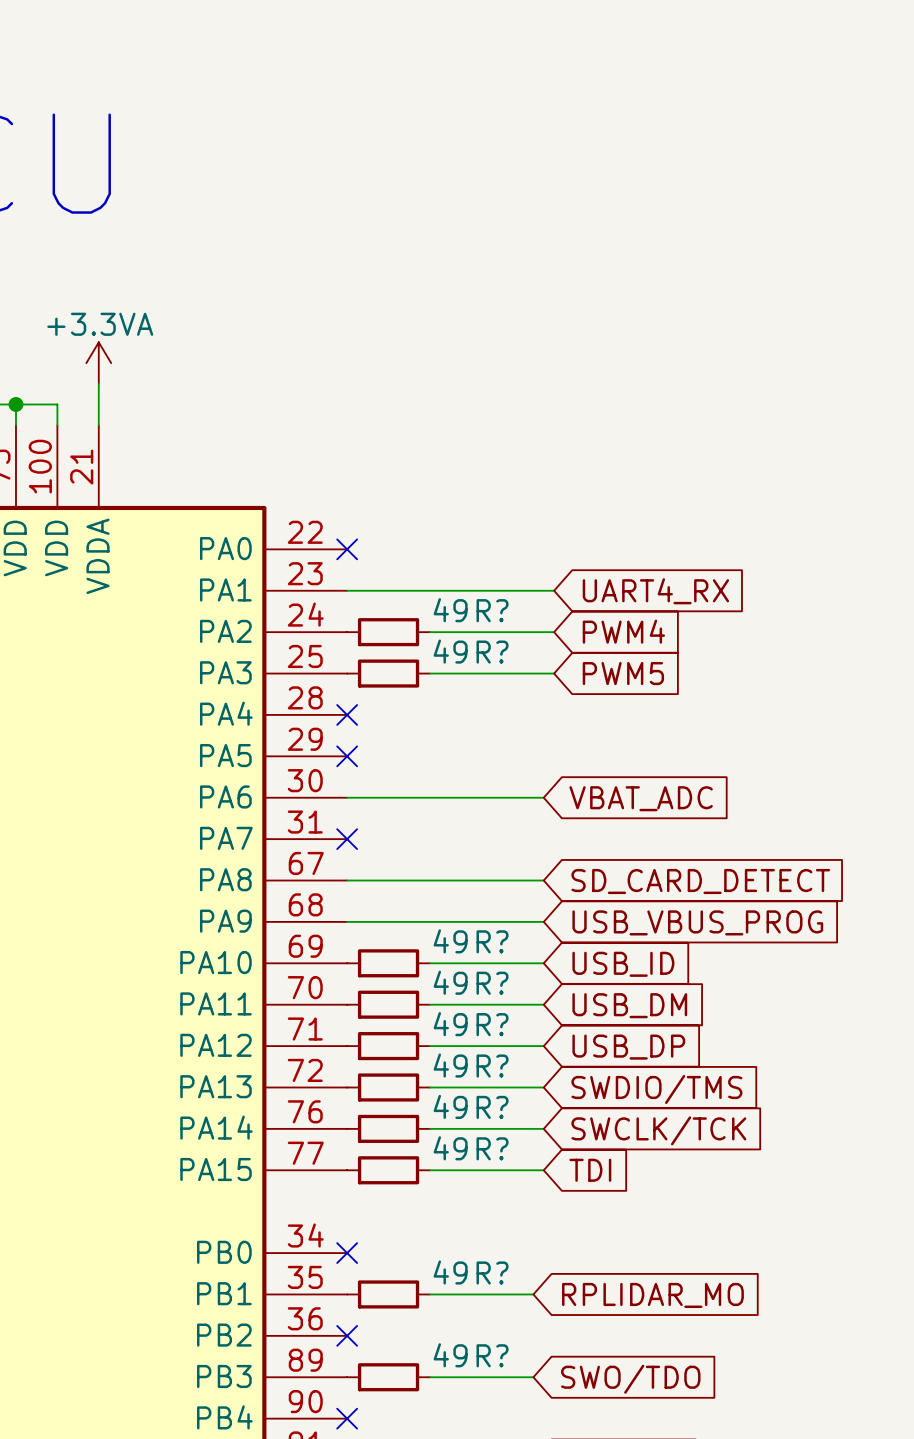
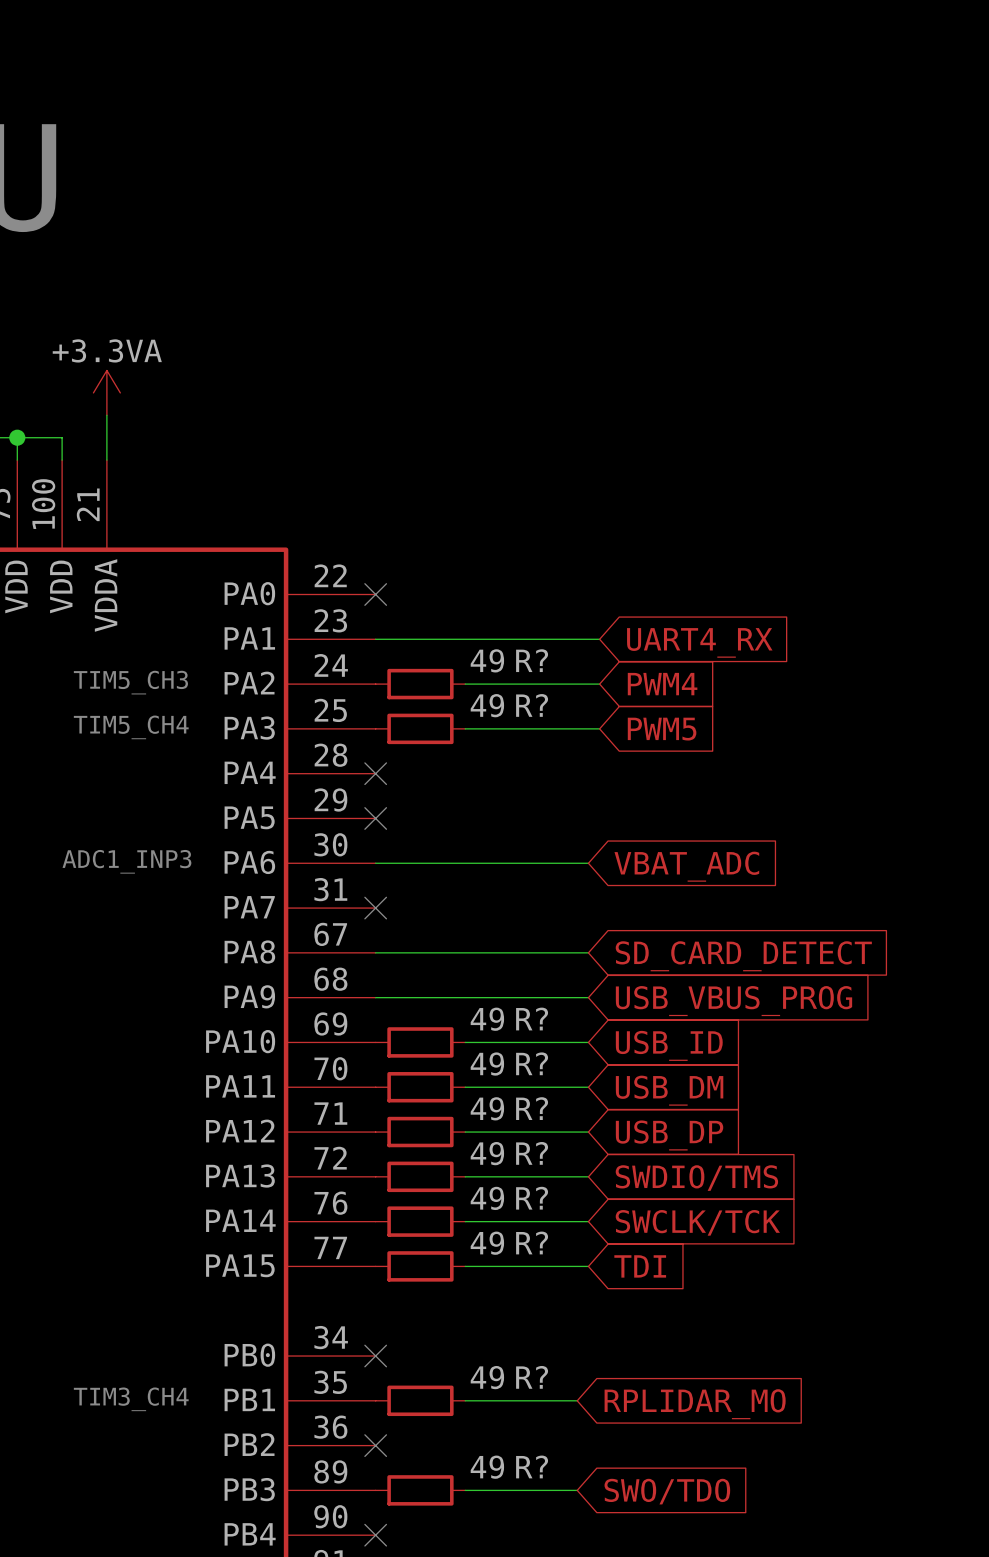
text: none -> TIM5_CH3 (130, 682)
text: none -> TIM5_CH4 (131, 727)
text: none -> ADC1_INP3 (126, 861)
text: none -> TIM3_CH4 (131, 1399)

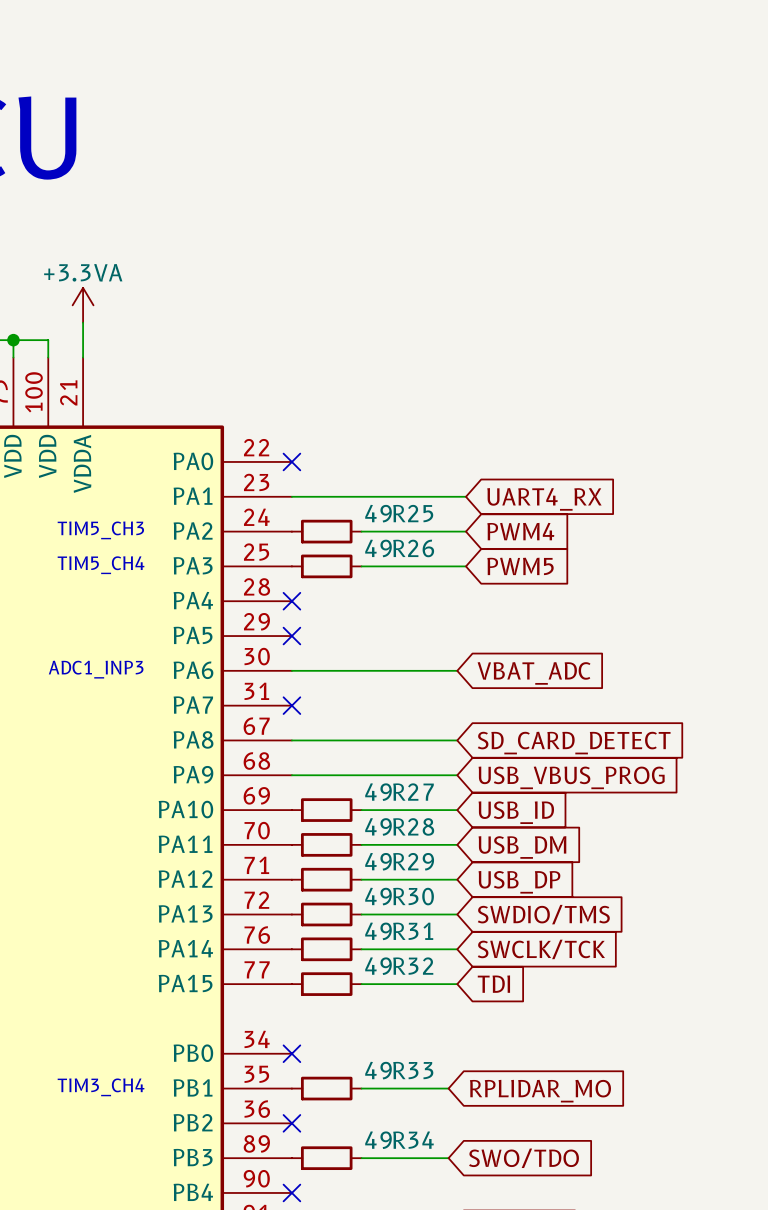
R? name: R? (532, 660) -> R25 (413, 513)
R? name: R? (532, 705) -> R26 (413, 548)
R? name: R? (532, 1019) -> R27 (413, 792)
R? name: R? (532, 1063) -> R28 (413, 826)
R? name: R? (532, 1108) -> R29 (413, 861)
R? name: R? (532, 1153) -> R30 (413, 896)
R? name: R? (532, 1198) -> R31 (413, 931)
R? name: R? (532, 1242) -> R32 (413, 966)
R? name: R? (532, 1377) -> R33 (413, 1070)
R? name: R? (532, 1466) -> R34 (413, 1140)

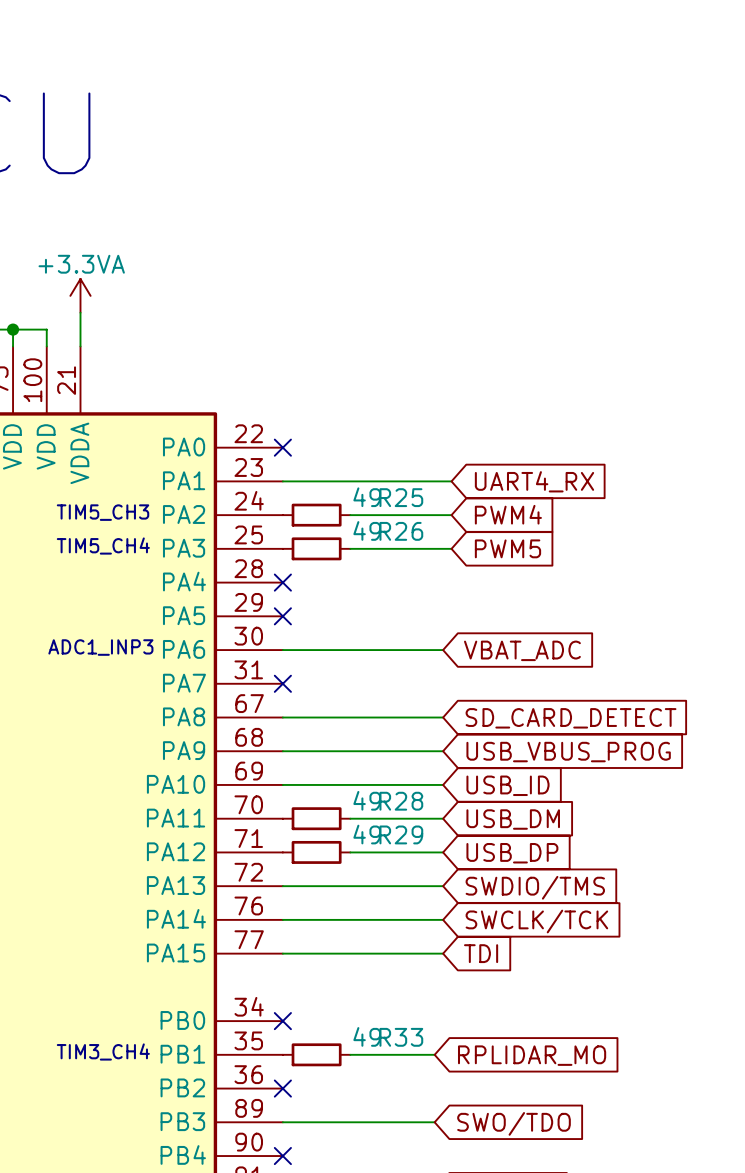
wire: none -> (282, 784) (350, 784)
R27: 49 (326, 810) -> none
wire: none -> (282, 886) (350, 886)
R30: 49 (326, 914) -> none
wire: none -> (282, 919) (350, 919)
R31: 49 (326, 949) -> none
wire: none -> (282, 953) (350, 953)
R32: 49 (326, 984) -> none
wire: none -> (282, 1122) (350, 1122)
R34: 49 (326, 1158) -> none

